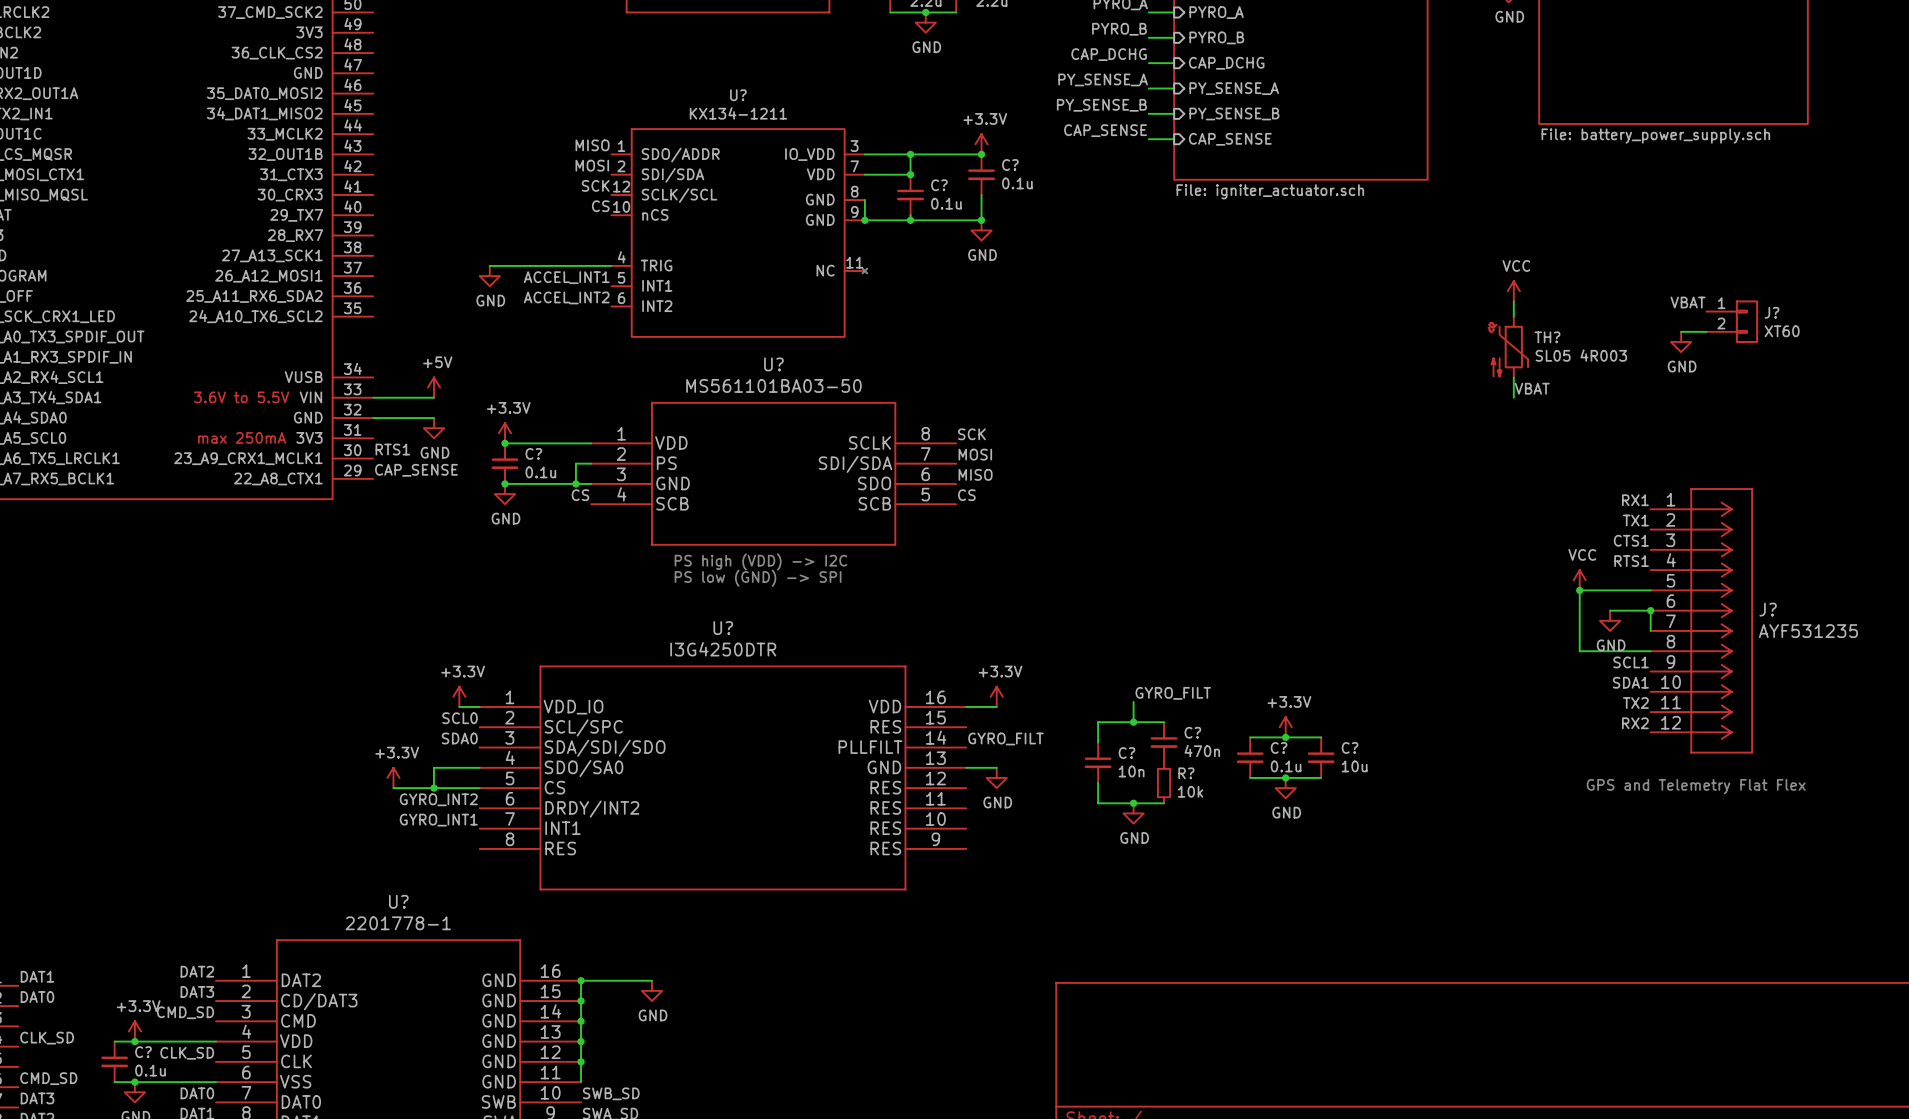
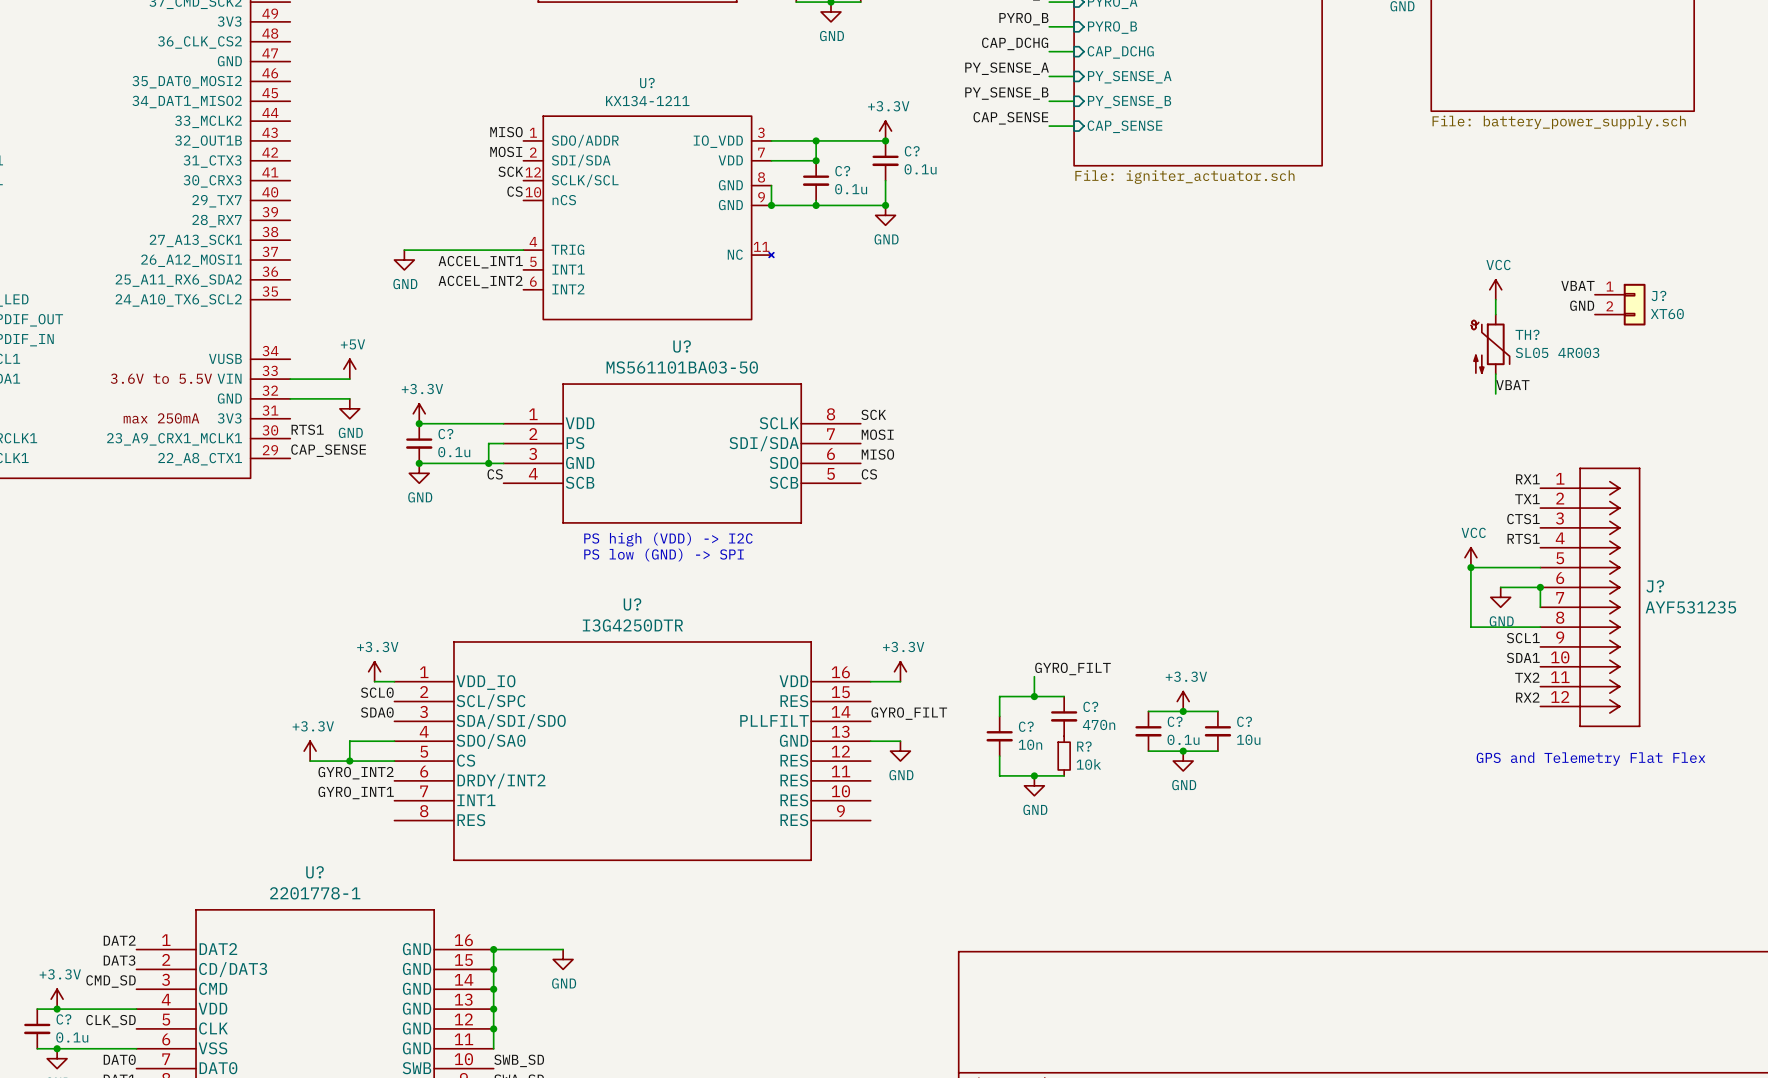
power symbol position: VCC (1513, 291) -> VCC (1495, 289)
wire: (1513, 301) (1513, 316) -> (1495, 299) (1495, 314)
label: none -> GND (1582, 305)
wire: (1681, 331) (1706, 331) -> none
power symbol: GND (1681, 341) -> none
TH? position: (1508, 347) -> (1490, 344)
wire: (1513, 377) (1513, 397) -> (1495, 374) (1495, 393)
label position: VBAT (1532, 388) -> VBAT (1512, 385)

